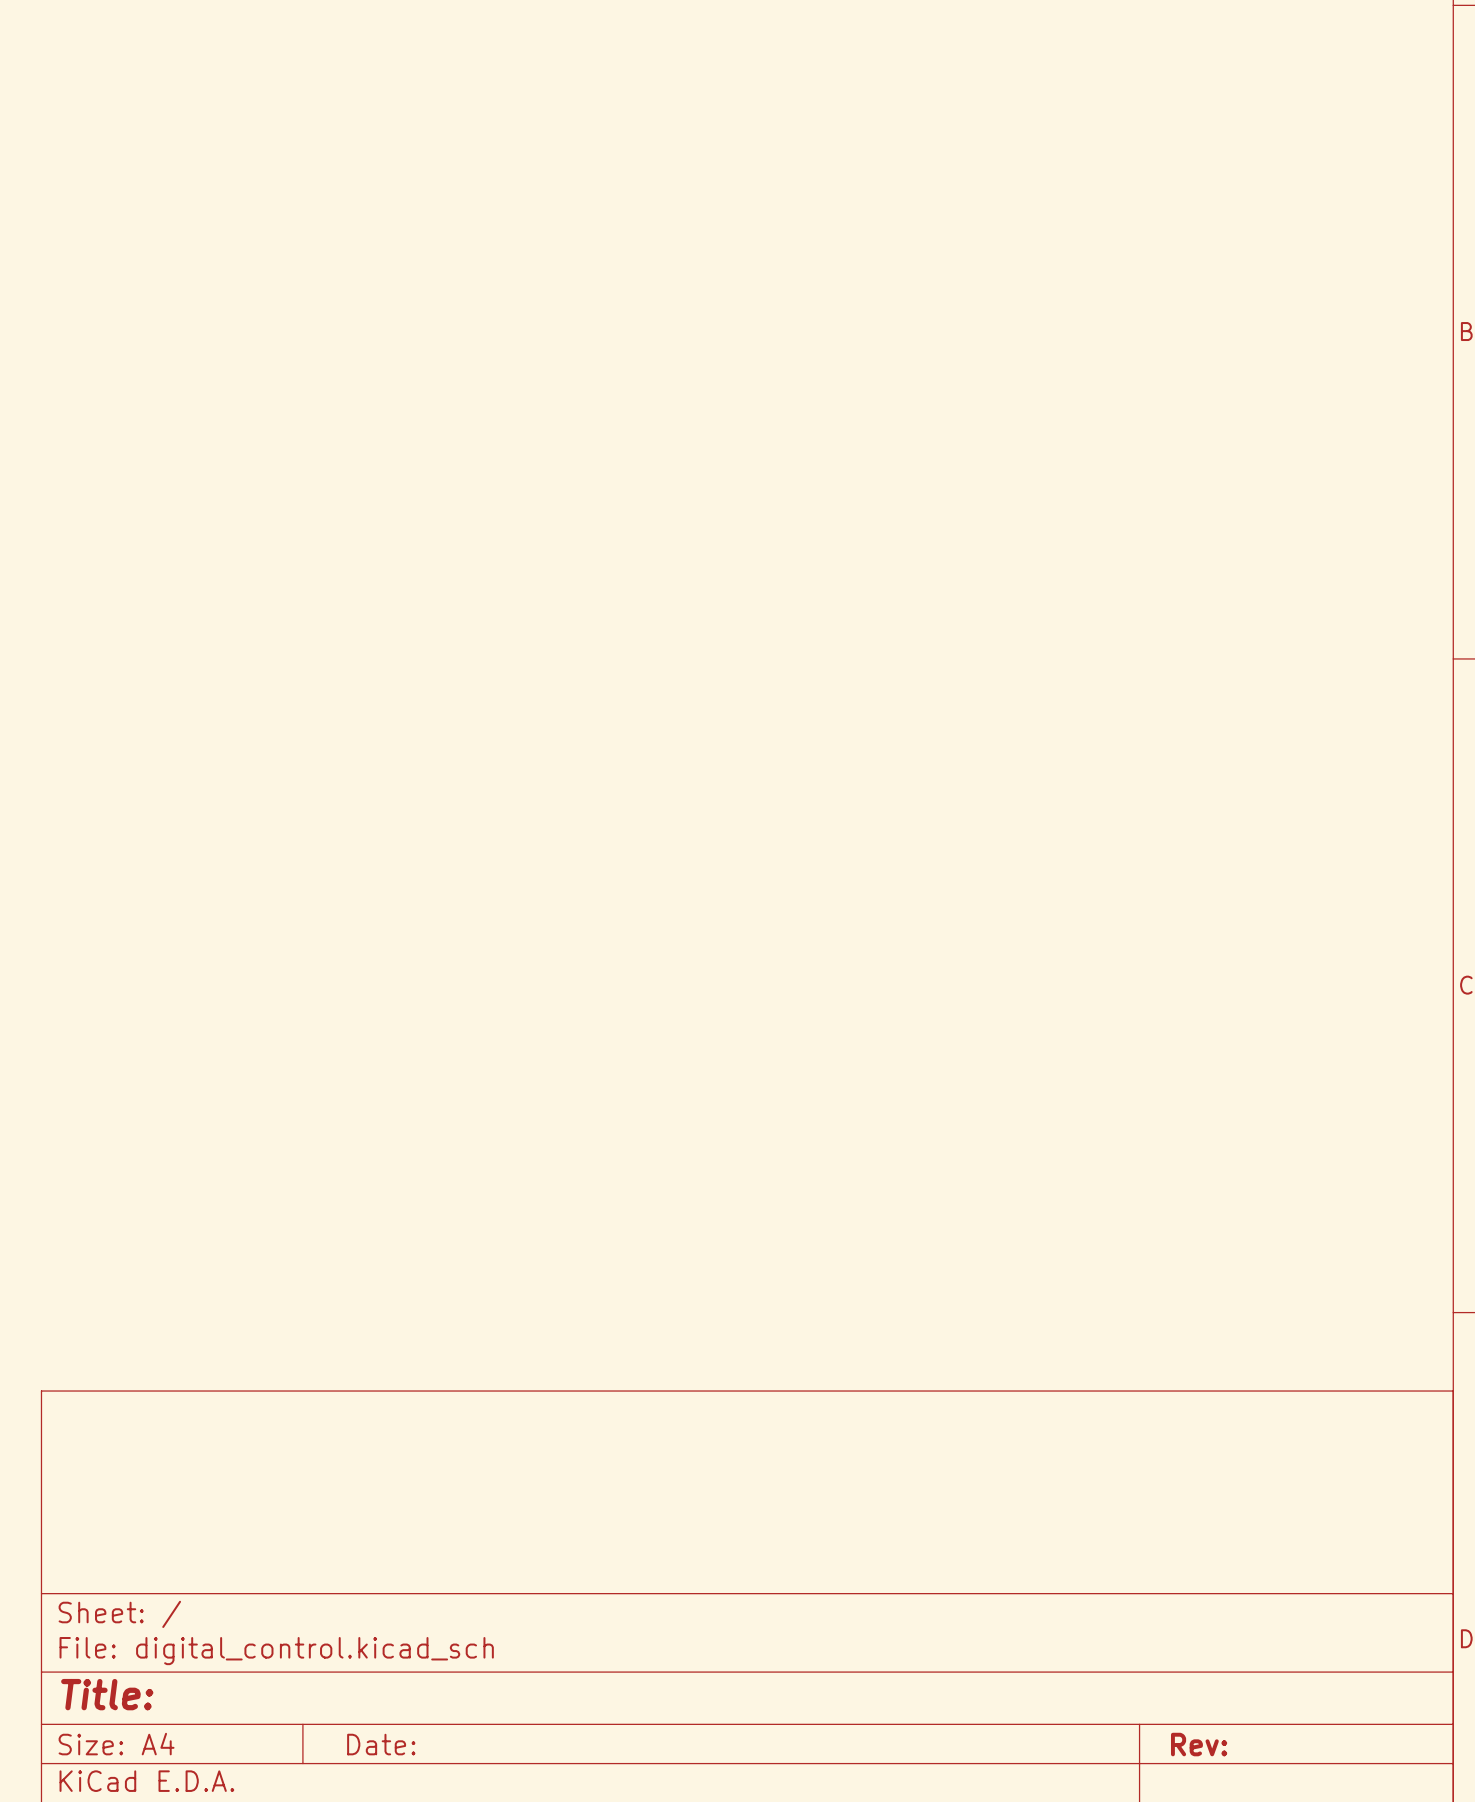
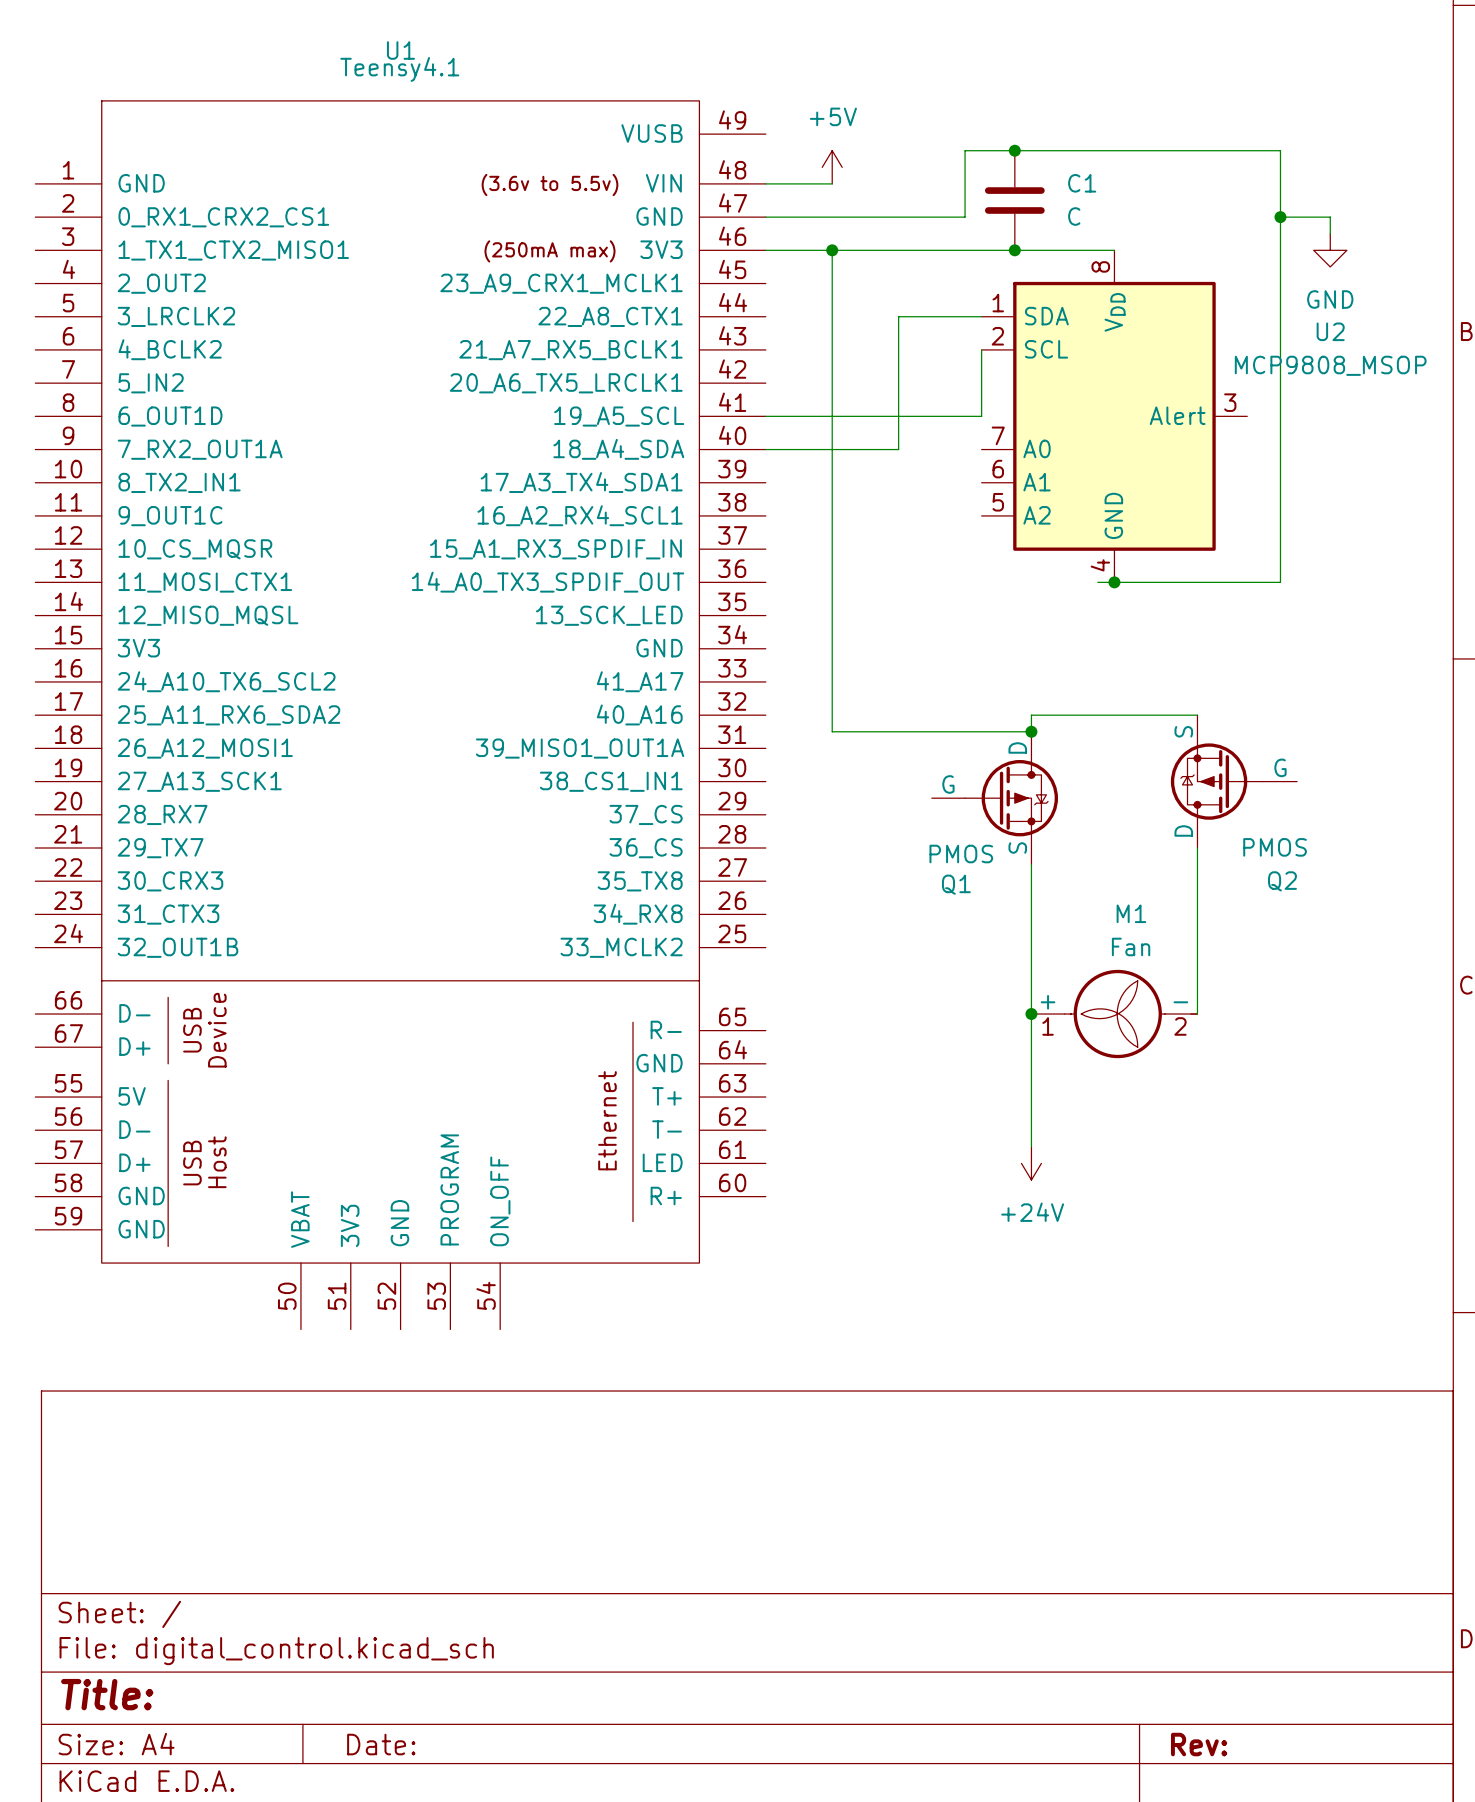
junction: none -> (1014, 150)
power symbol: none -> +5V (832, 167)
wire: none -> (765, 183) (832, 183)
C1: none -> C (1014, 200)
wire: none -> (765, 217) (965, 217) (965, 150) (1280, 150) (1280, 582) (1097, 582)
wire: none -> (1280, 217) (1330, 217) (1330, 233)
junction: none -> (1280, 217)
wire: none -> (765, 250) (1114, 250)
wire: none -> (832, 250) (832, 731) (1031, 731) (1031, 715) (1197, 715)
junction: none -> (832, 250)
junction: none -> (1014, 250)
power symbol: none -> GND (1330, 250)
wire: none -> (981, 316) (898, 316) (898, 449) (765, 449)
wire: none -> (981, 349) (981, 416) (765, 416)
U2: none -> MCP9808_MSOP (1114, 416)
junction: none -> (1114, 582)
U1: none -> Teensy4.1 (400, 715)
junction: none -> (1031, 731)
Q2: none -> PMOS (1233, 781)
Q1: none -> PMOS (994, 798)
wire: none -> (1197, 847) (1197, 1014)
wire: none -> (1031, 864) (1031, 1146)
junction: none -> (1031, 1014)
M1: none -> Fan (1114, 1014)
power symbol: none -> +24V (1031, 1163)

